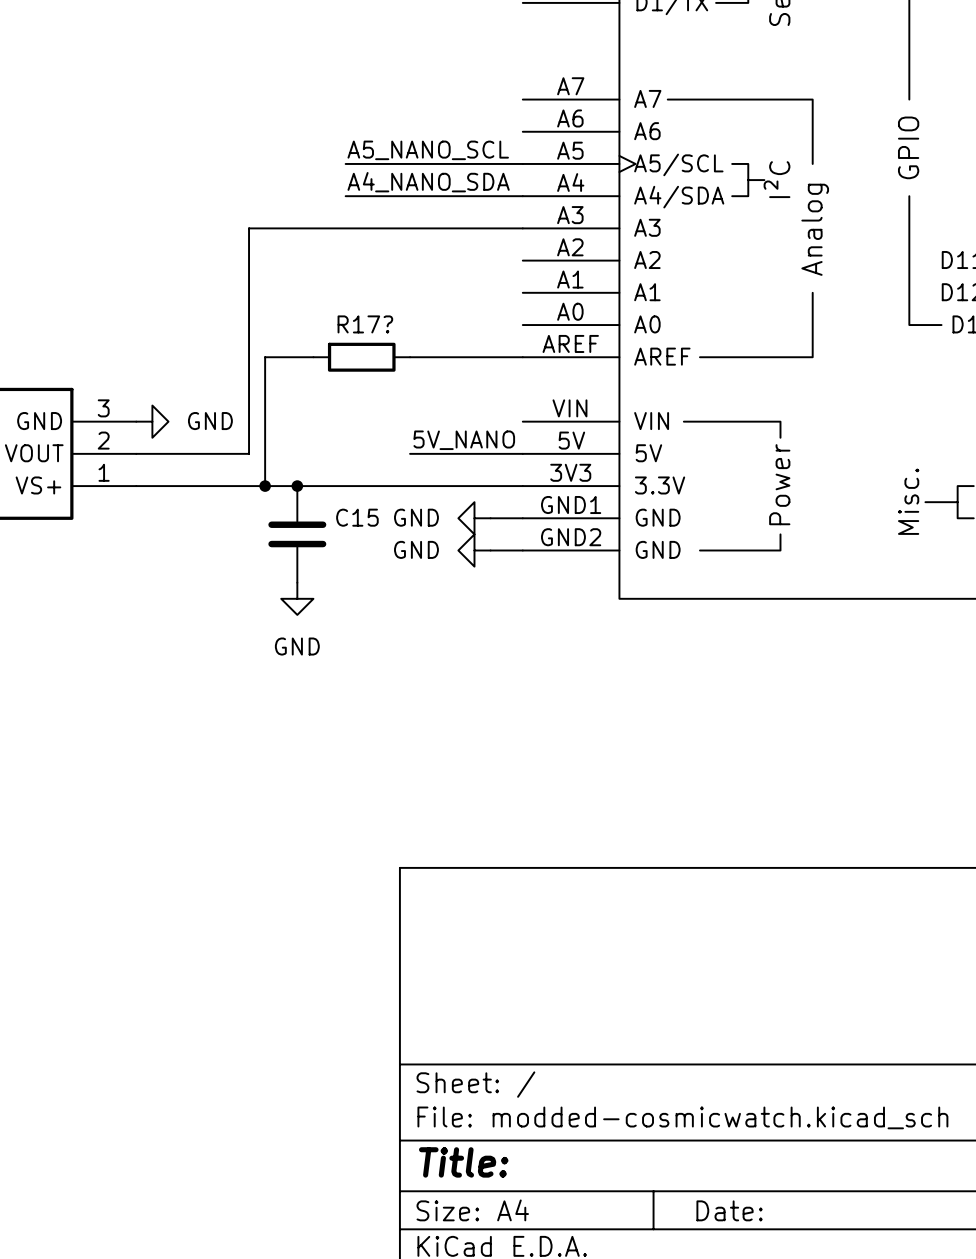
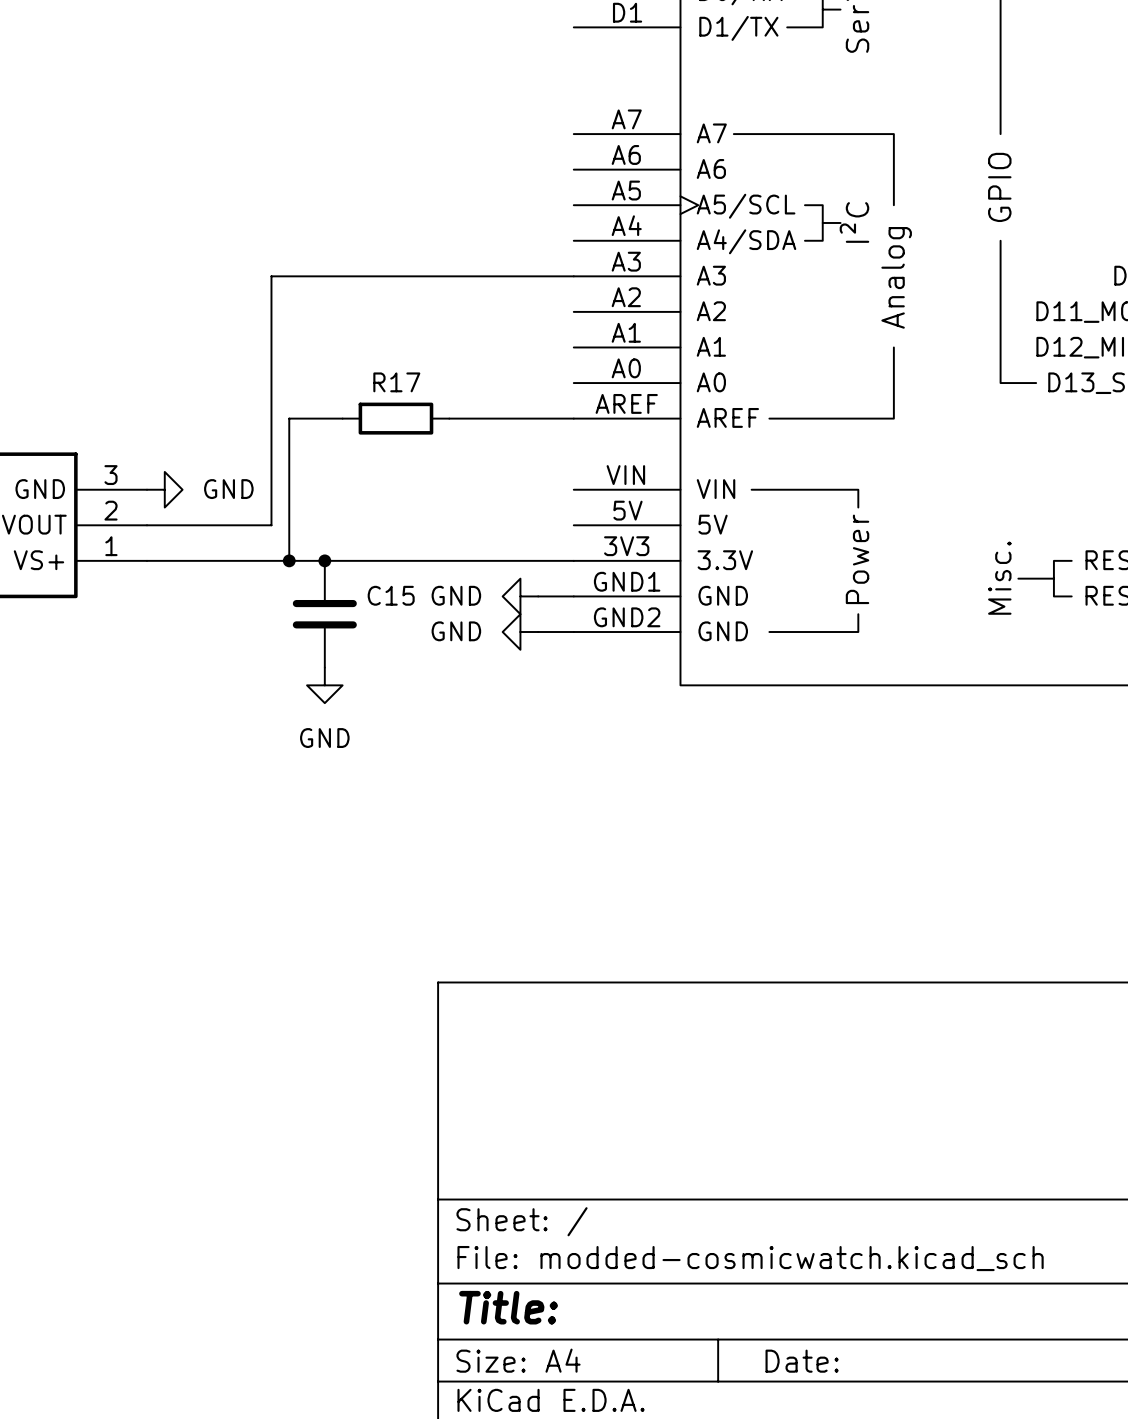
label: A5_NANO_SCL (428, 150) -> none
wire: (345, 163) (522, 163) -> none
label: A4_NANO_SDA (428, 182) -> none
wire: (345, 196) (522, 196) -> none
R17? name: R17? (365, 324) -> R17 (396, 382)
label: 5V_NANO (464, 440) -> none
wire: (410, 453) (522, 453) -> none

